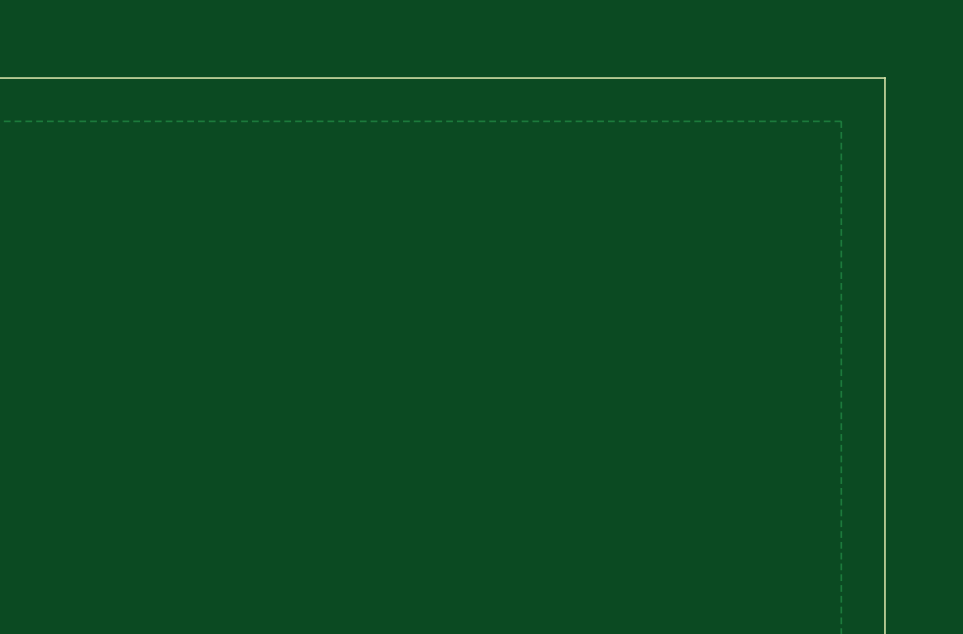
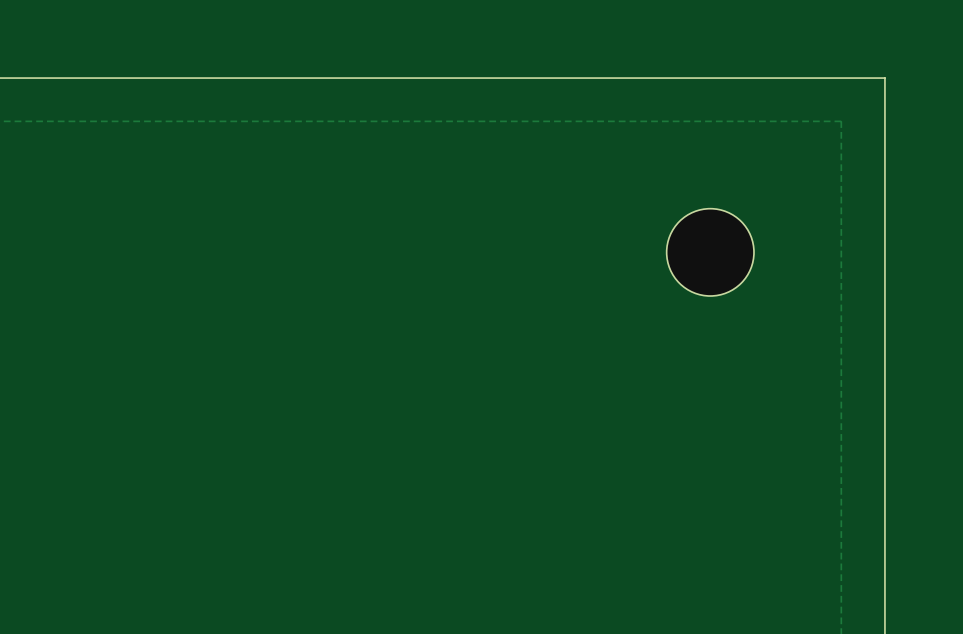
hole: none -> (710, 252)

